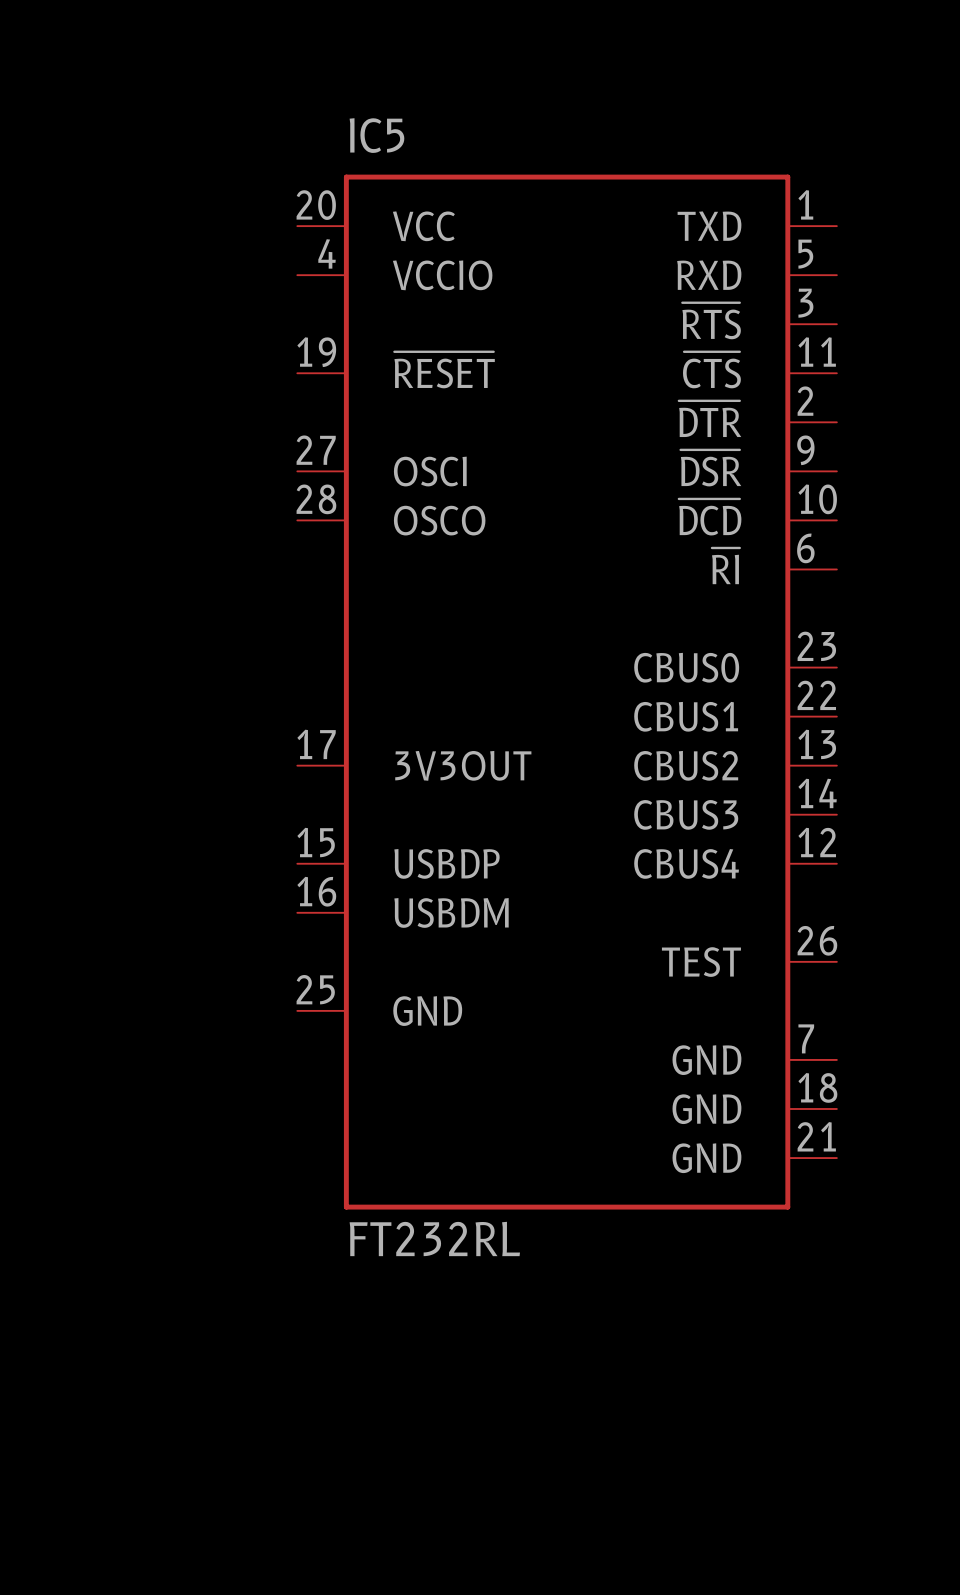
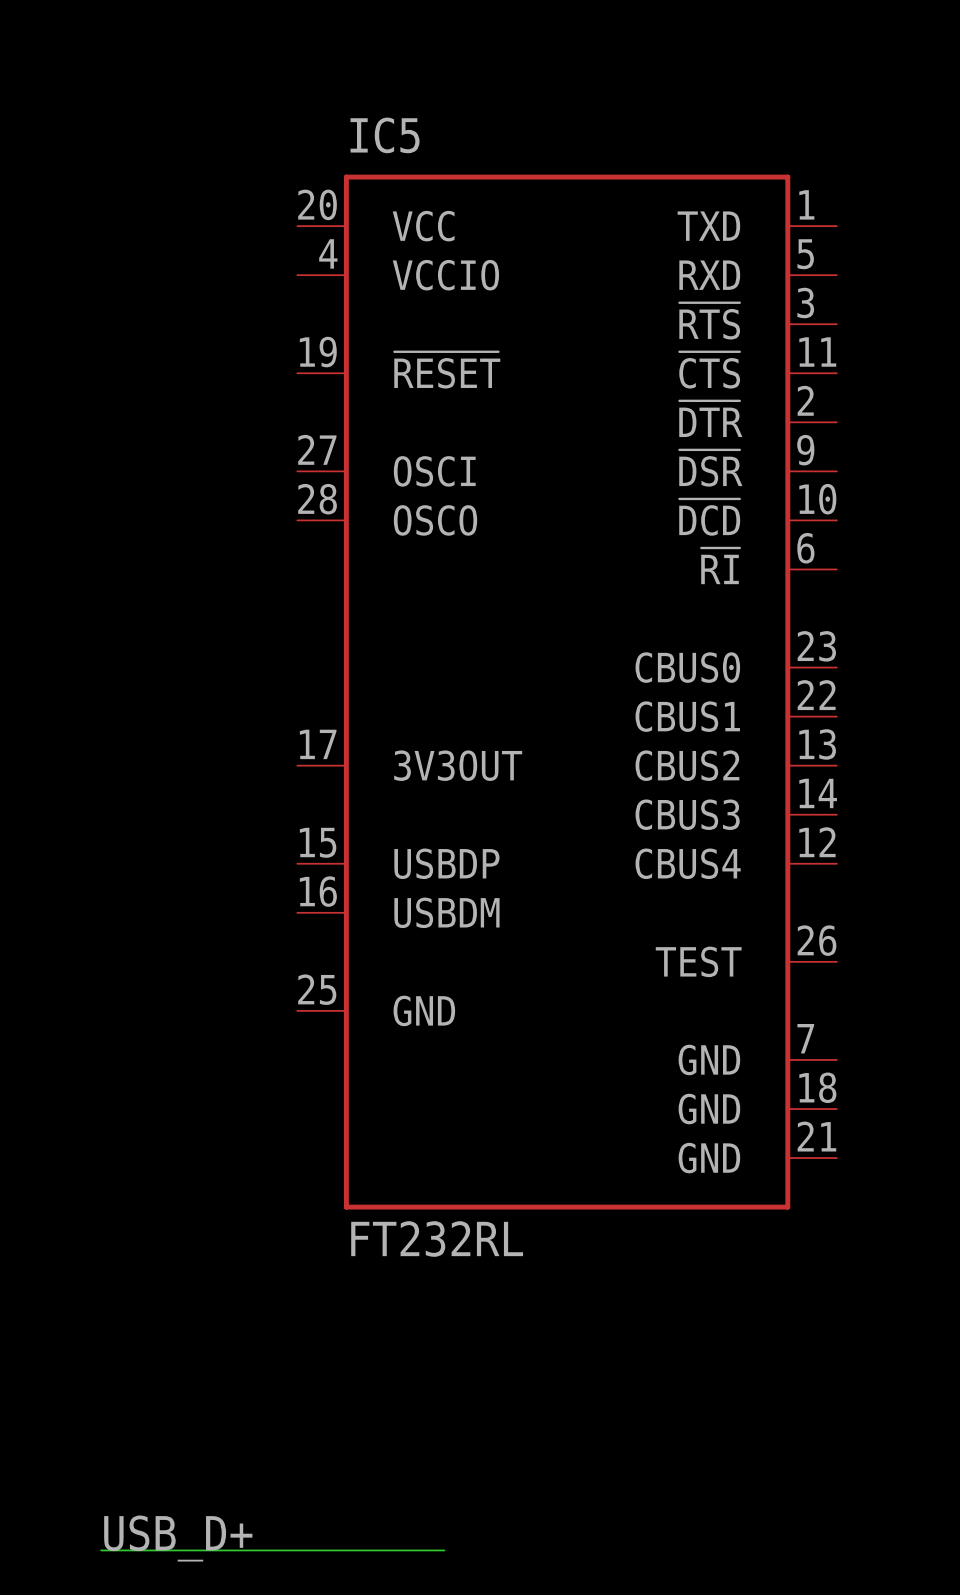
label: none -> USB_D+ (178, 1538)
wire: none -> (101, 1550) (444, 1550)

